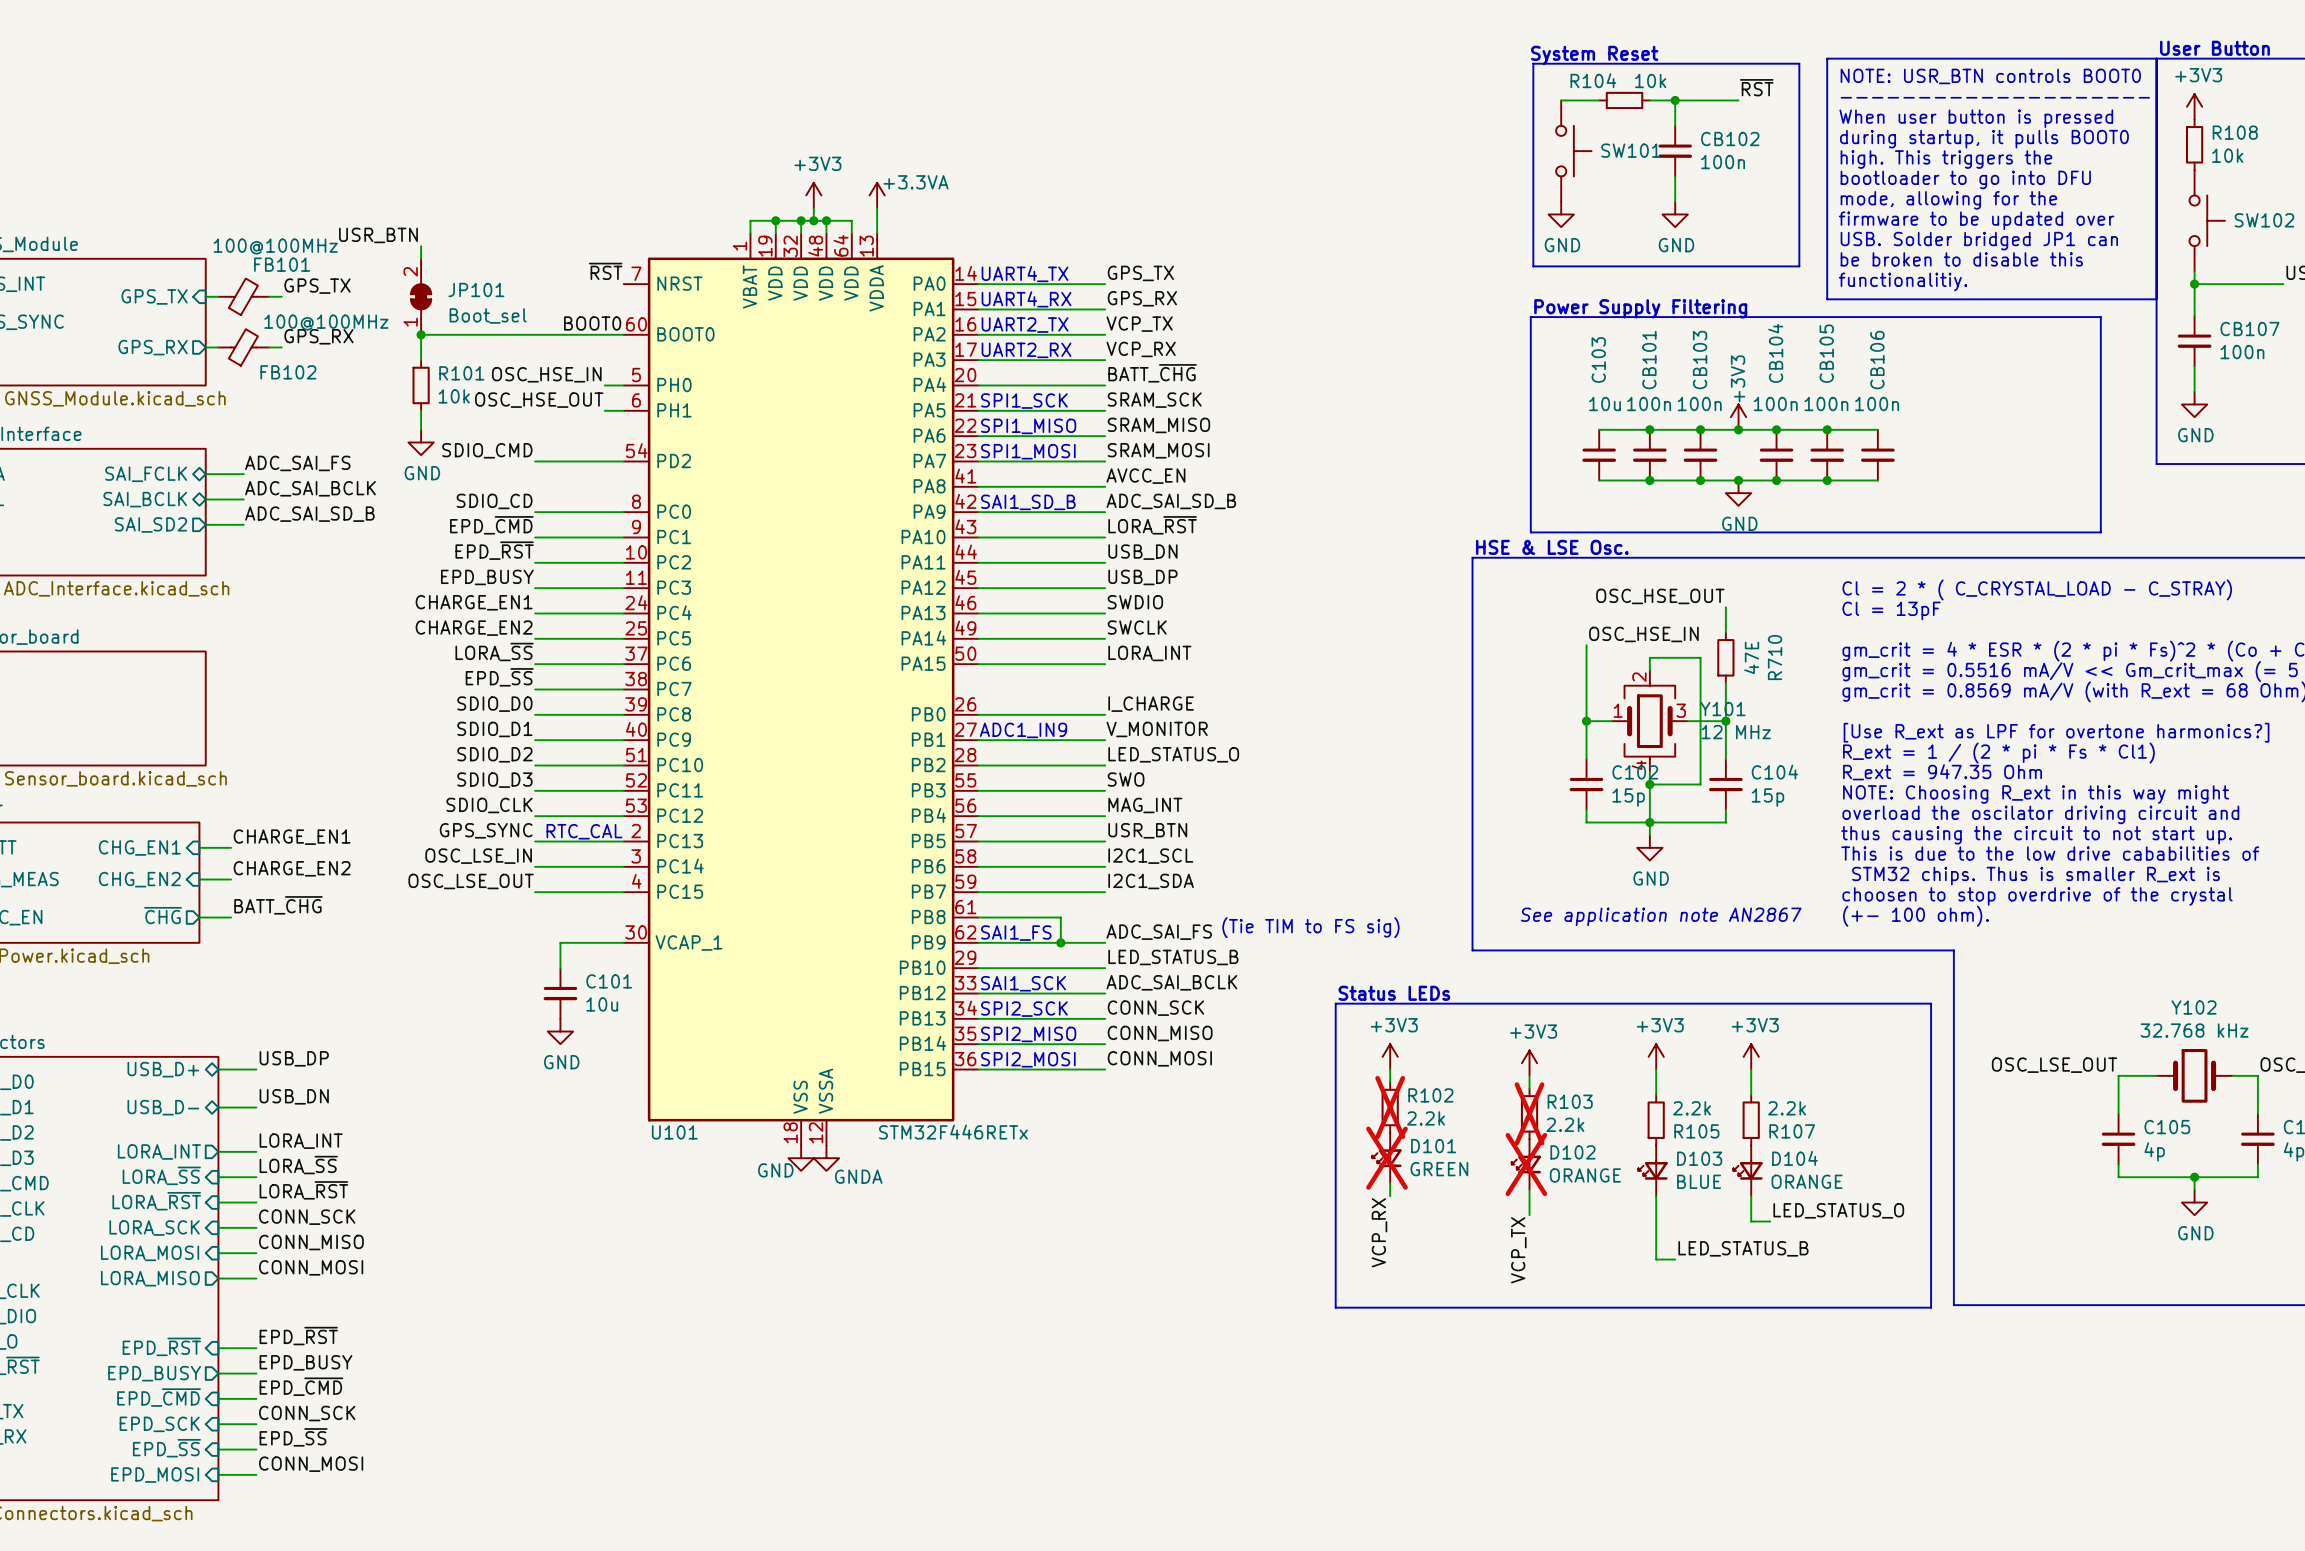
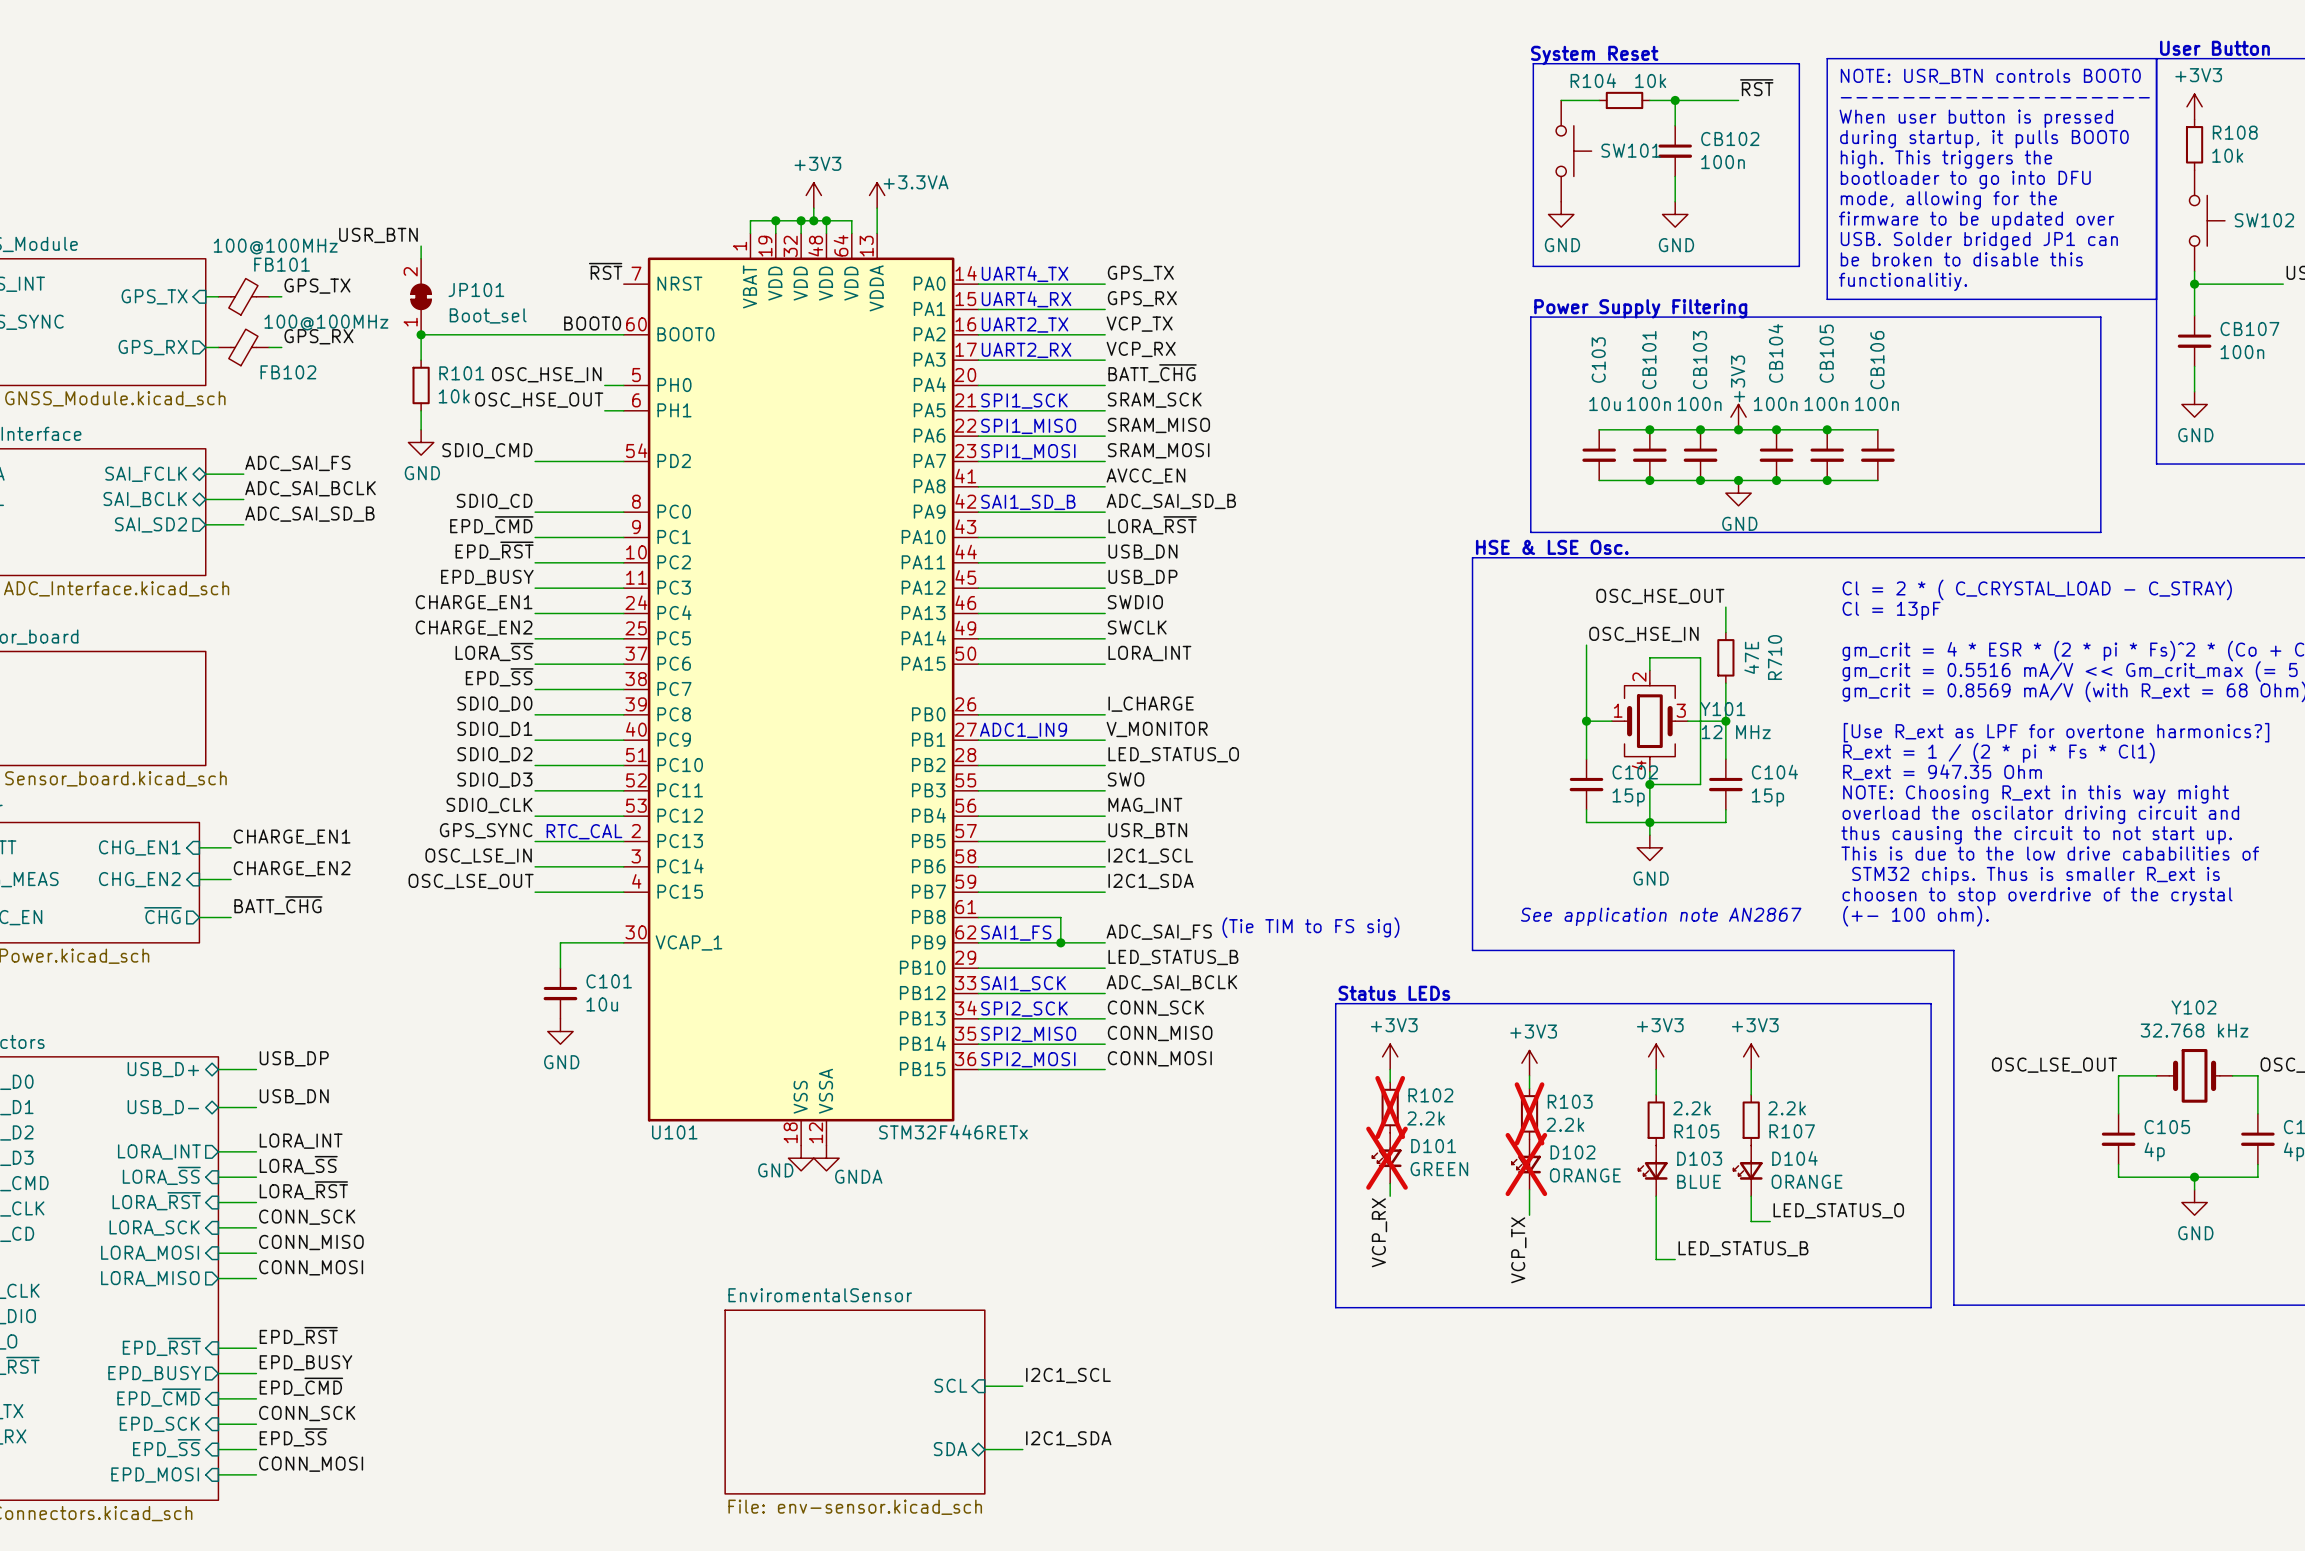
label: none -> I2C1_SCL (1068, 1375)
sheet pin: none -> SCL (950, 1385)
wire: none -> (984, 1386) (1022, 1386)
sheet EnviromentalSensor: none -> File: env-sensor.kicad_sch (854, 1402)
label: none -> I2C1_SDA (1068, 1438)
sheet pin: none -> SDA (950, 1449)
wire: none -> (984, 1449) (1022, 1449)

